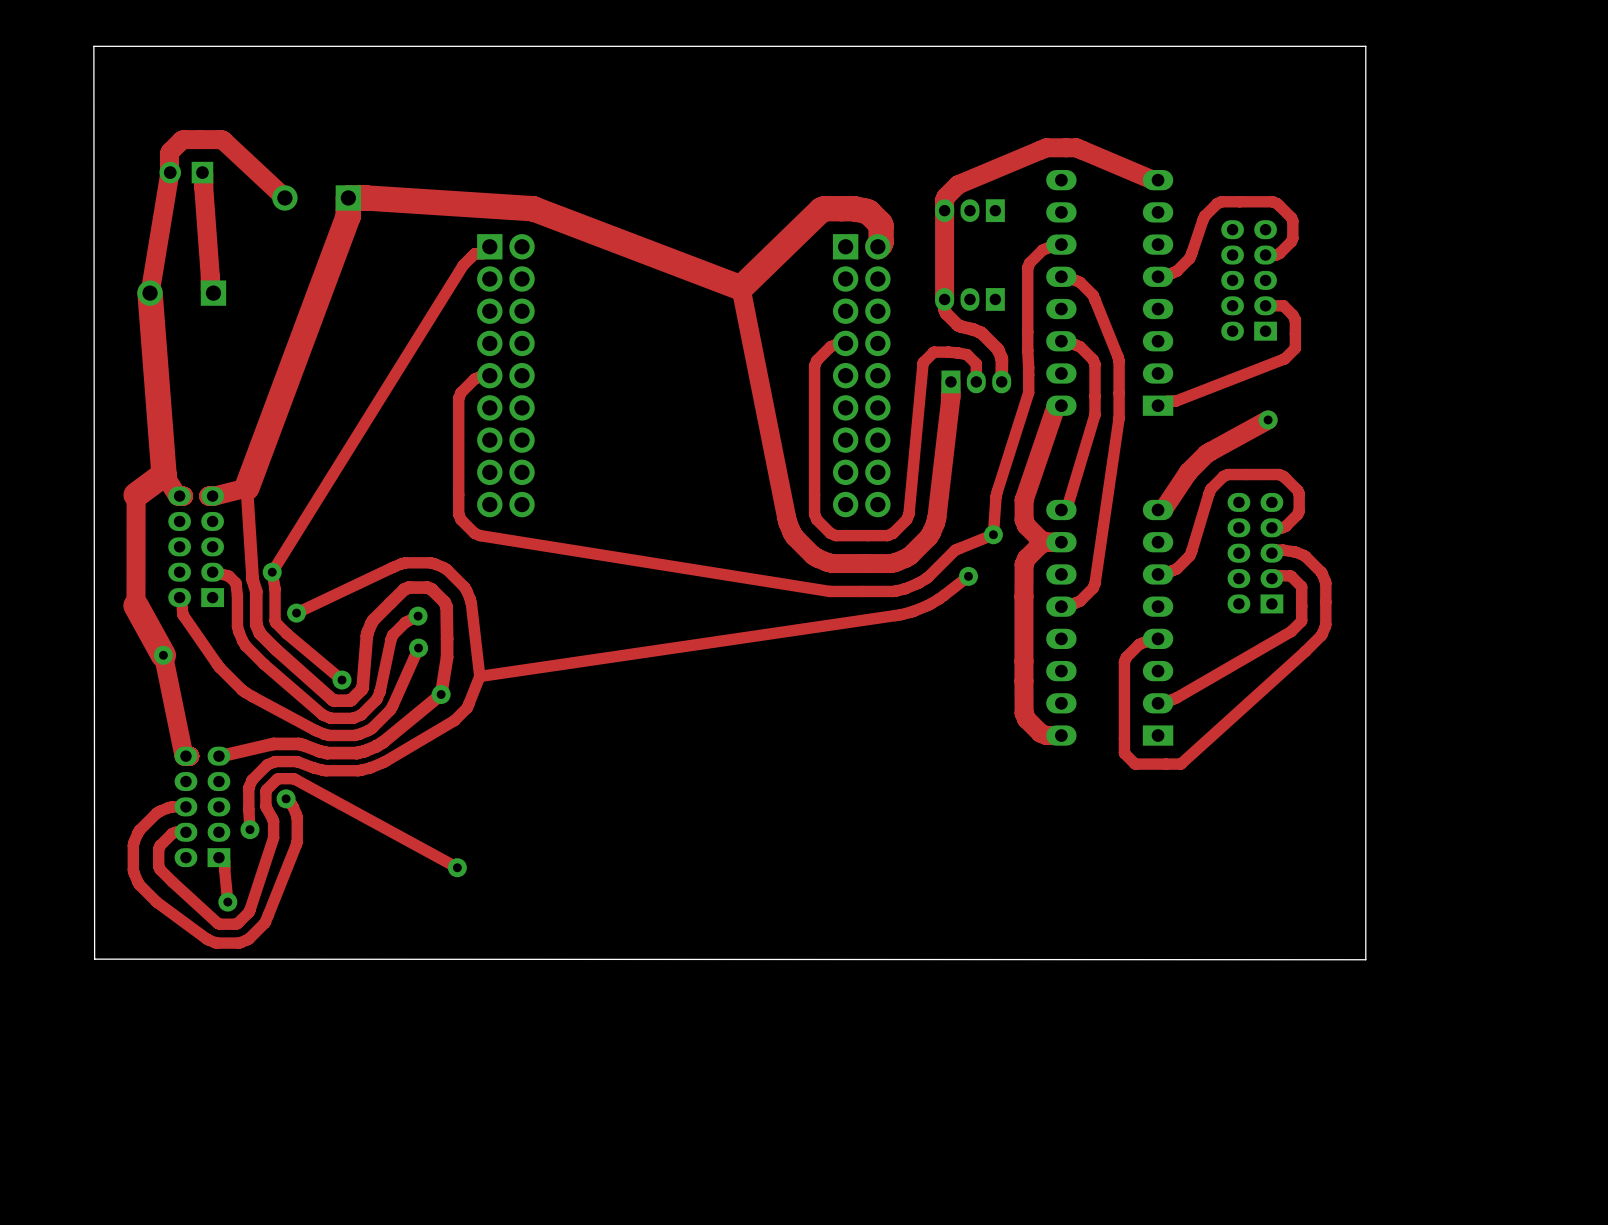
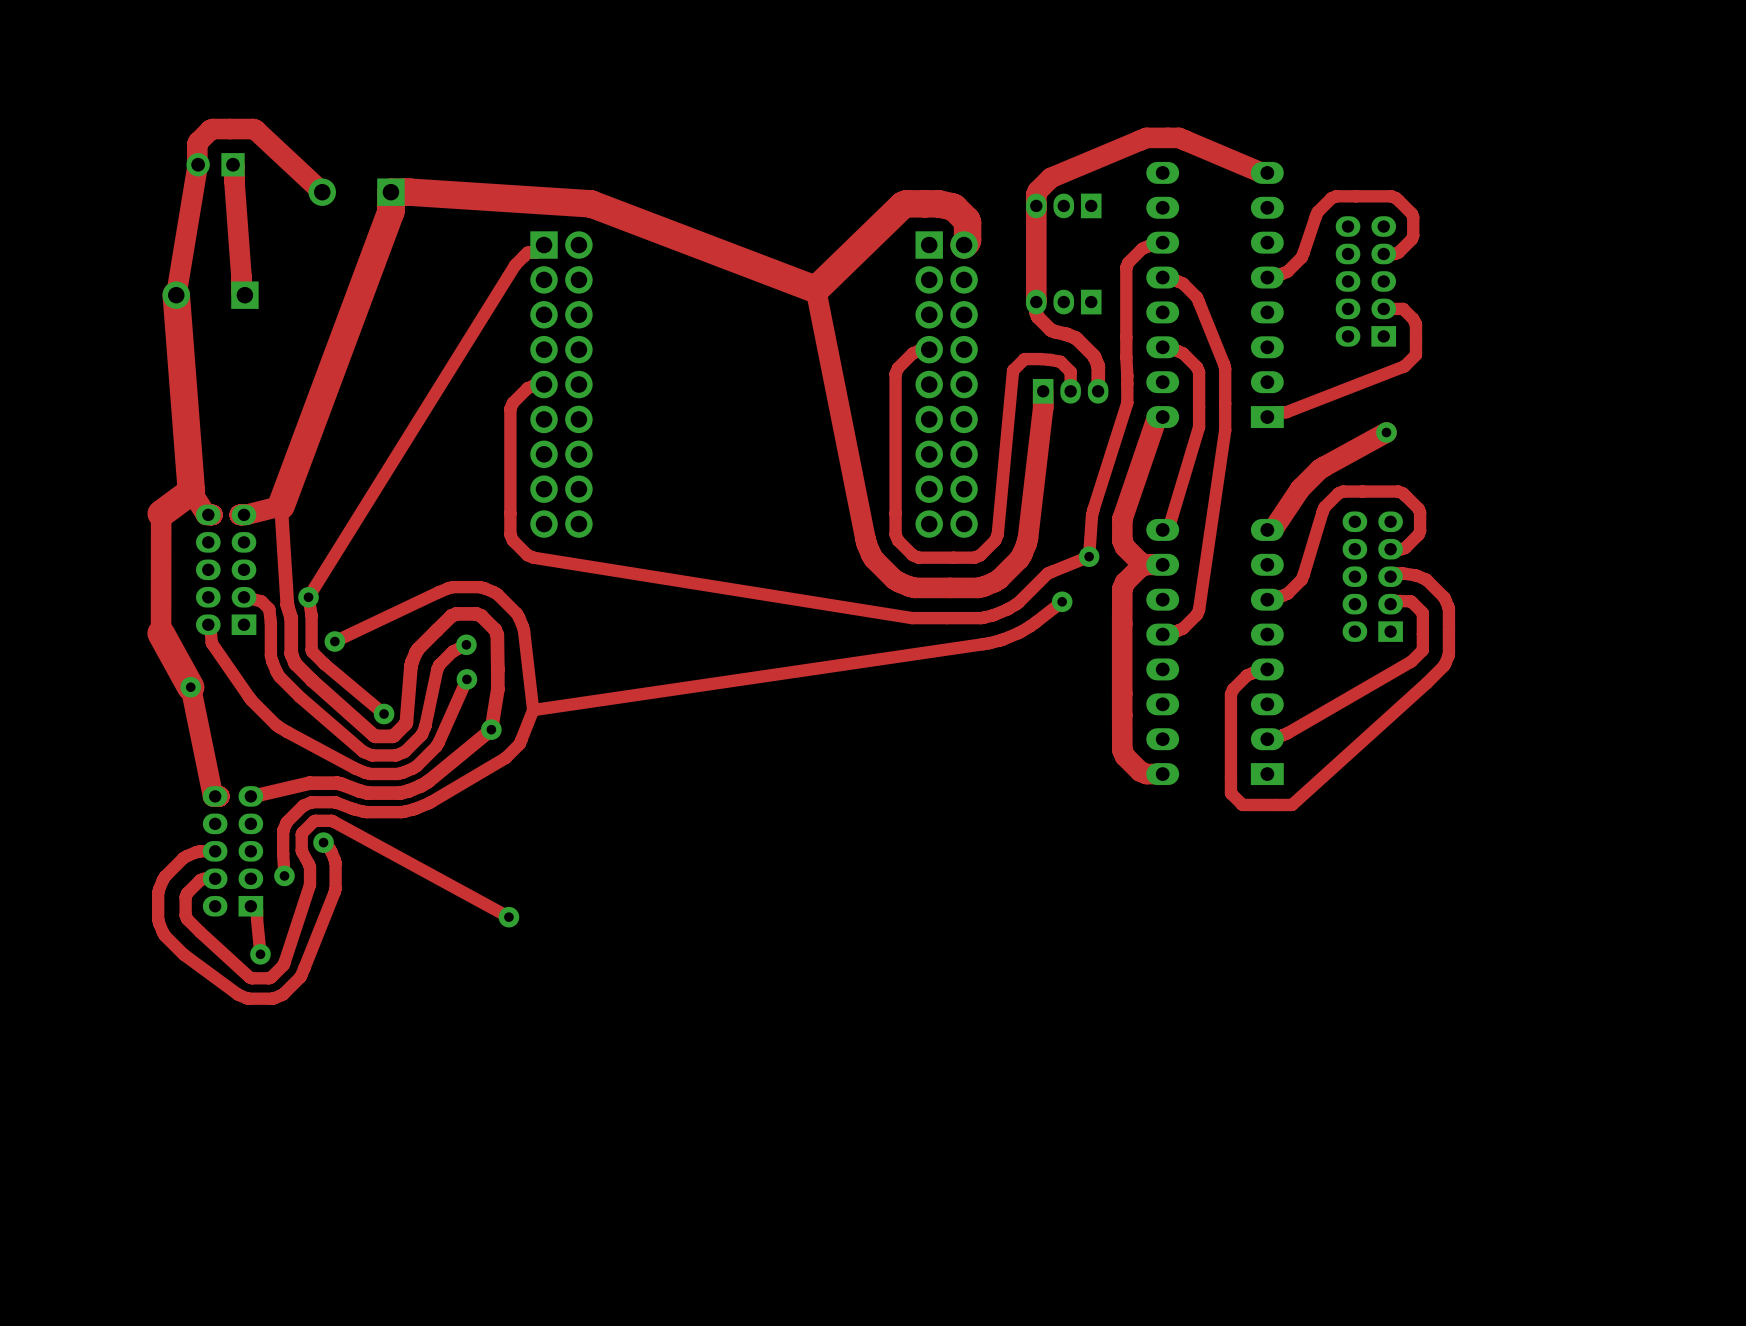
board edge: (93, 46) (1365, 46) (1365, 959) (94, 959) (93, 46) -> none

